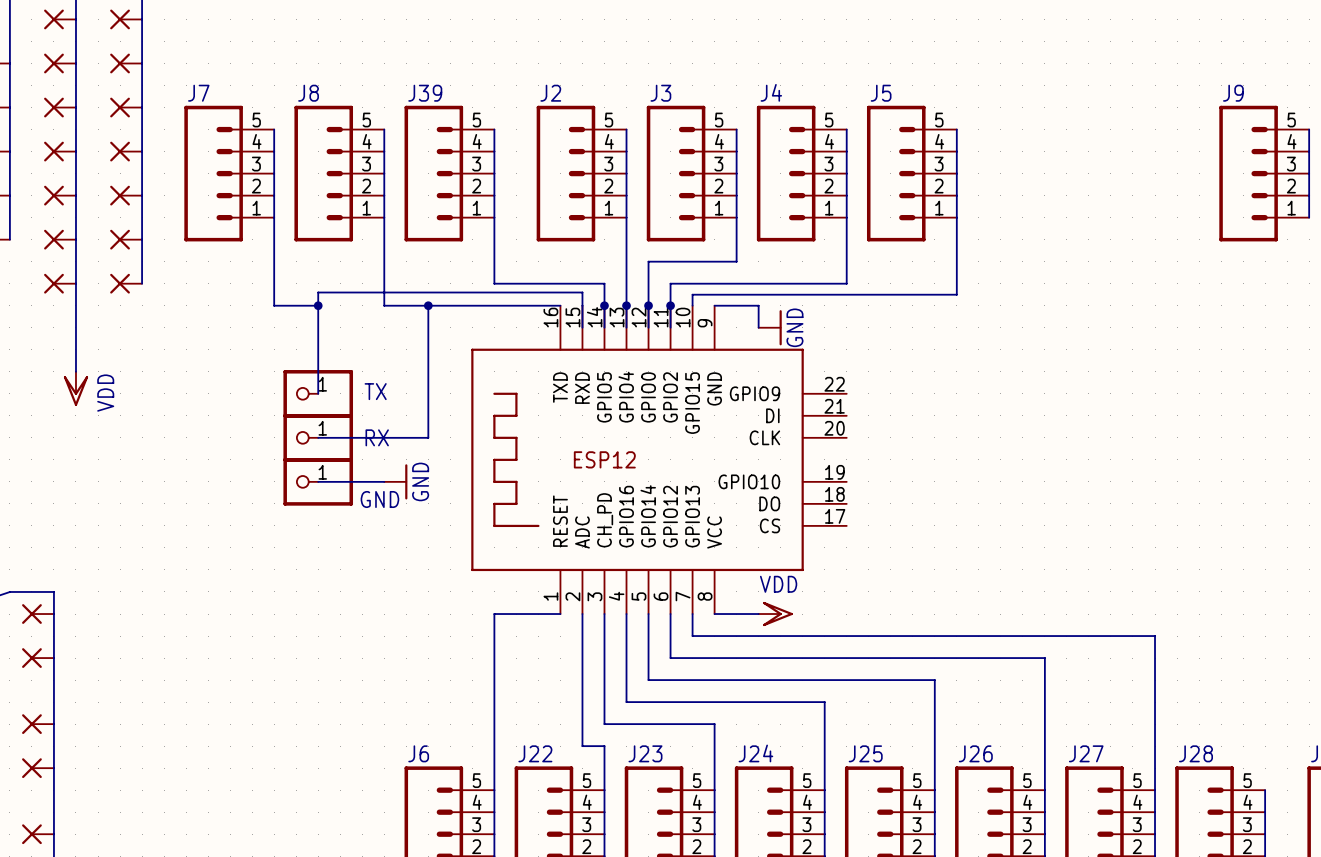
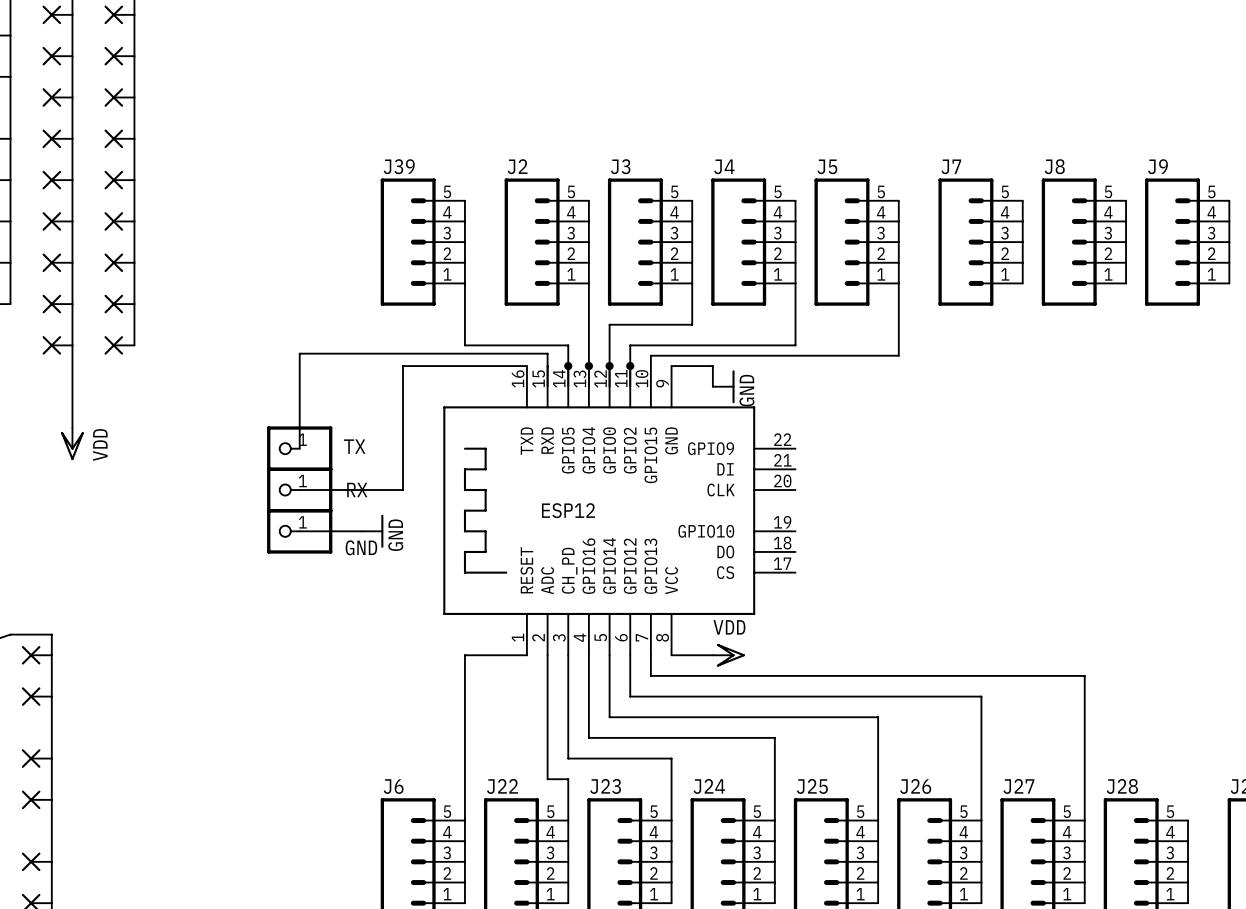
wire: (274, 129) (274, 305) (318, 305) -> none
wire: (384, 129) (384, 305) (428, 305) -> none
wire: none -> (1022, 200) (1022, 283)
wire: none -> (1126, 200) (1126, 283)
J7 position: (229, 173) -> (980, 242)
J8 position: (339, 173) -> (1083, 242)
junction: (318, 305) -> none
junction: (428, 305) -> none

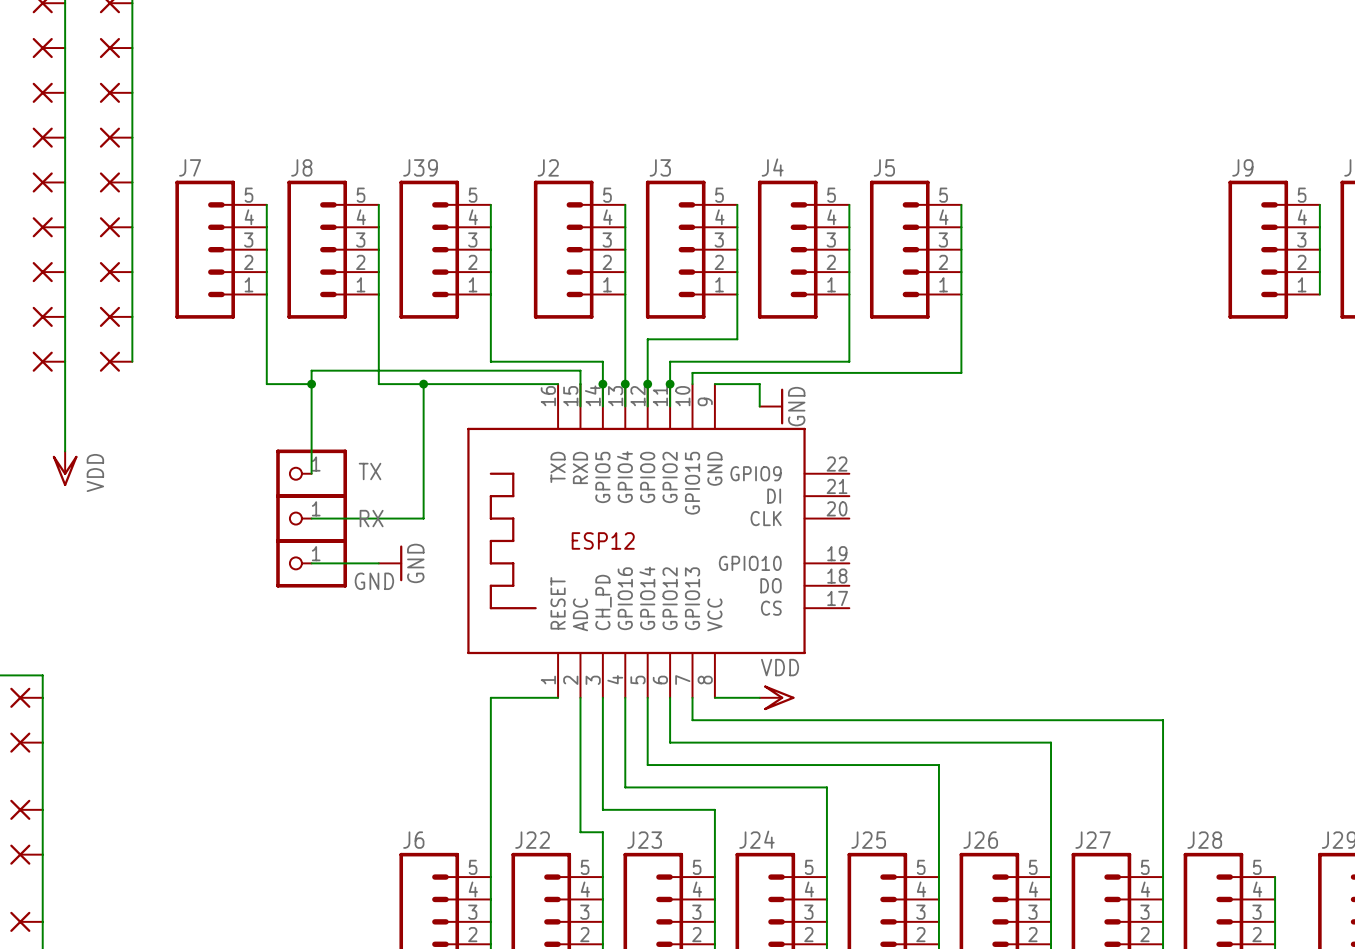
wire: none -> (266, 204) (266, 384) (311, 384)
wire: none -> (378, 204) (378, 384) (423, 384)
wire: (1022, 200) (1022, 283) -> none
wire: (1126, 200) (1126, 283) -> none
J7 position: (980, 242) -> (221, 249)
J8 position: (1083, 242) -> (333, 249)
junction: none -> (311, 384)
junction: none -> (423, 384)

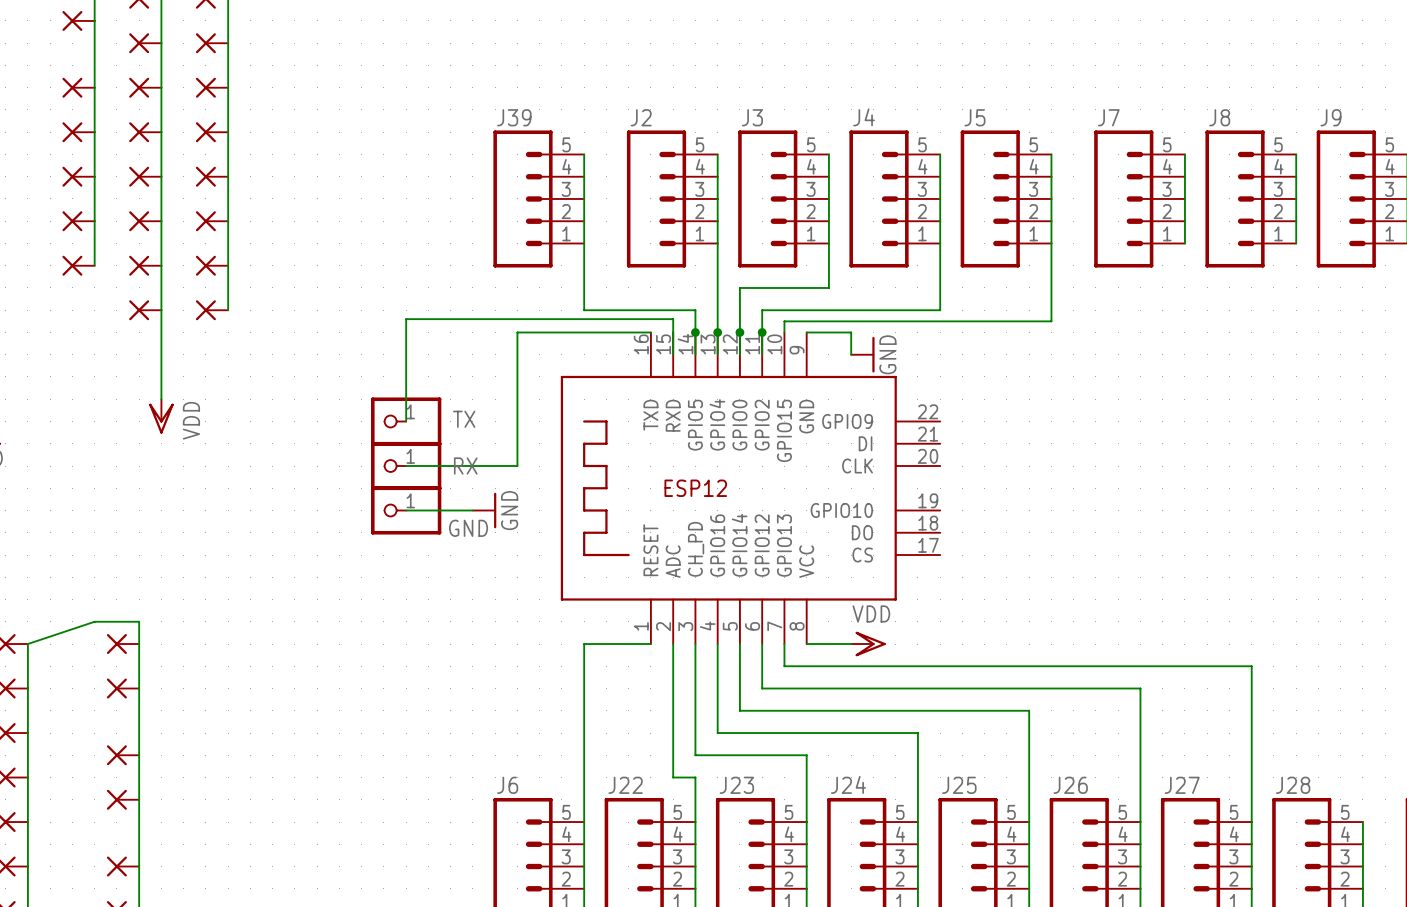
wire: (266, 204) (266, 384) (311, 384) -> none
wire: (378, 204) (378, 384) (423, 384) -> none
wire: none -> (1184, 154) (1184, 243)
wire: none -> (1296, 154) (1296, 243)
J7 position: (221, 249) -> (1139, 198)
J8 position: (333, 249) -> (1250, 198)
junction: (311, 384) -> none
junction: (423, 384) -> none

